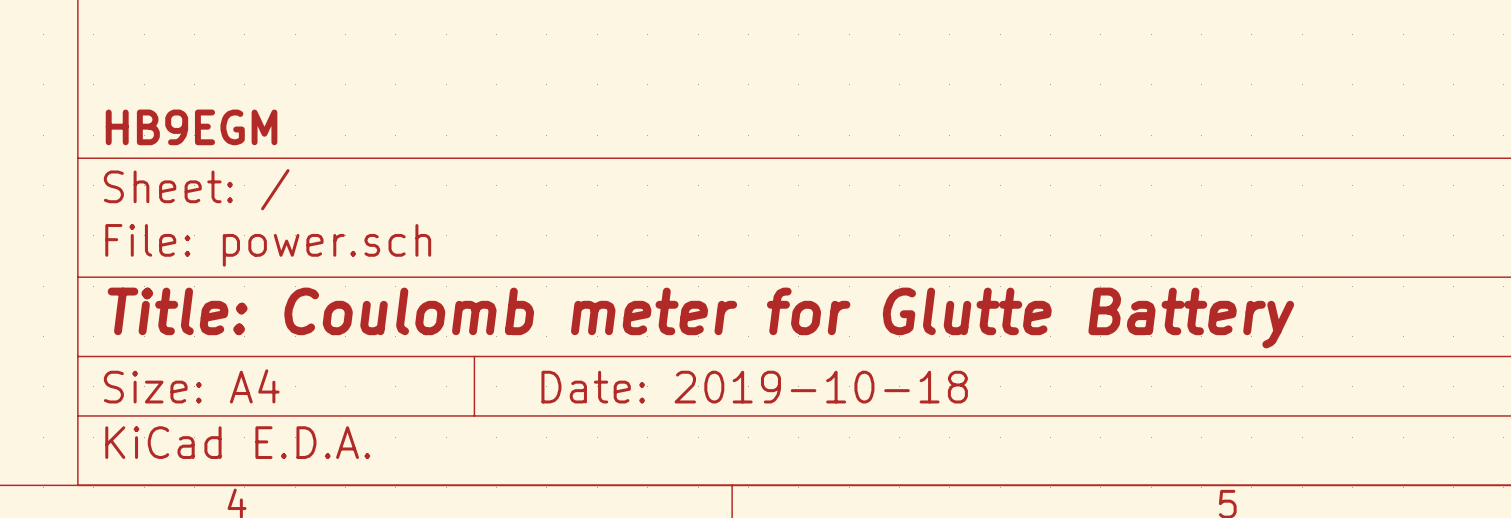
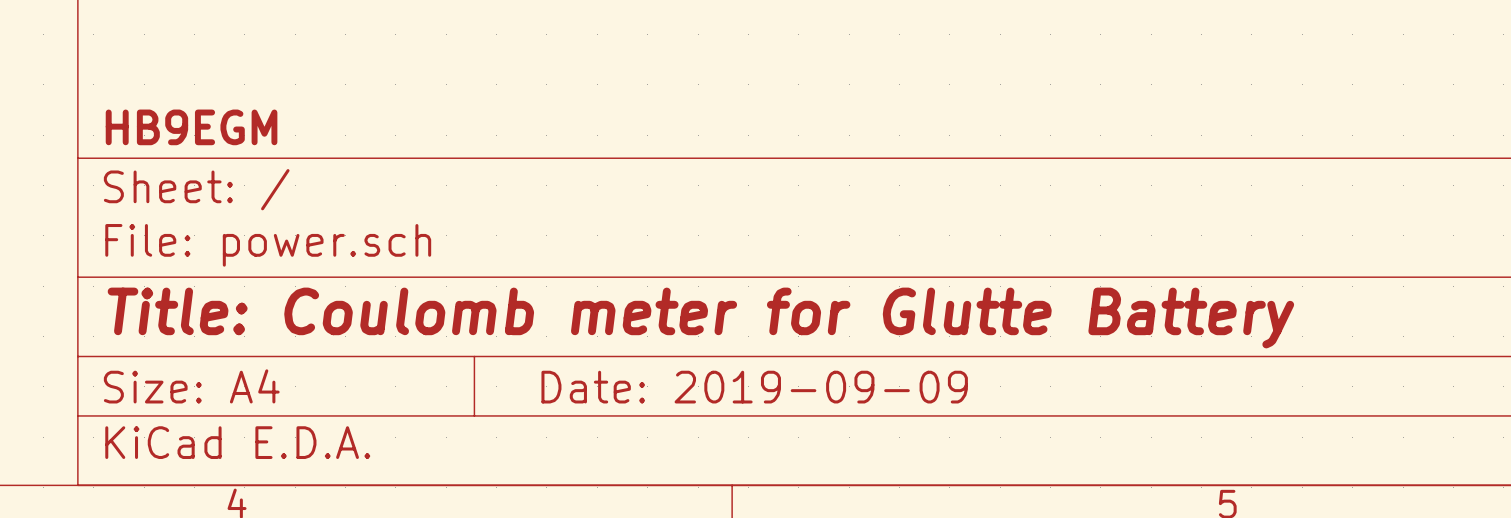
title block: Date: 2019-10-18 (754, 387) -> Date: 2019-09-09 (754, 387)

